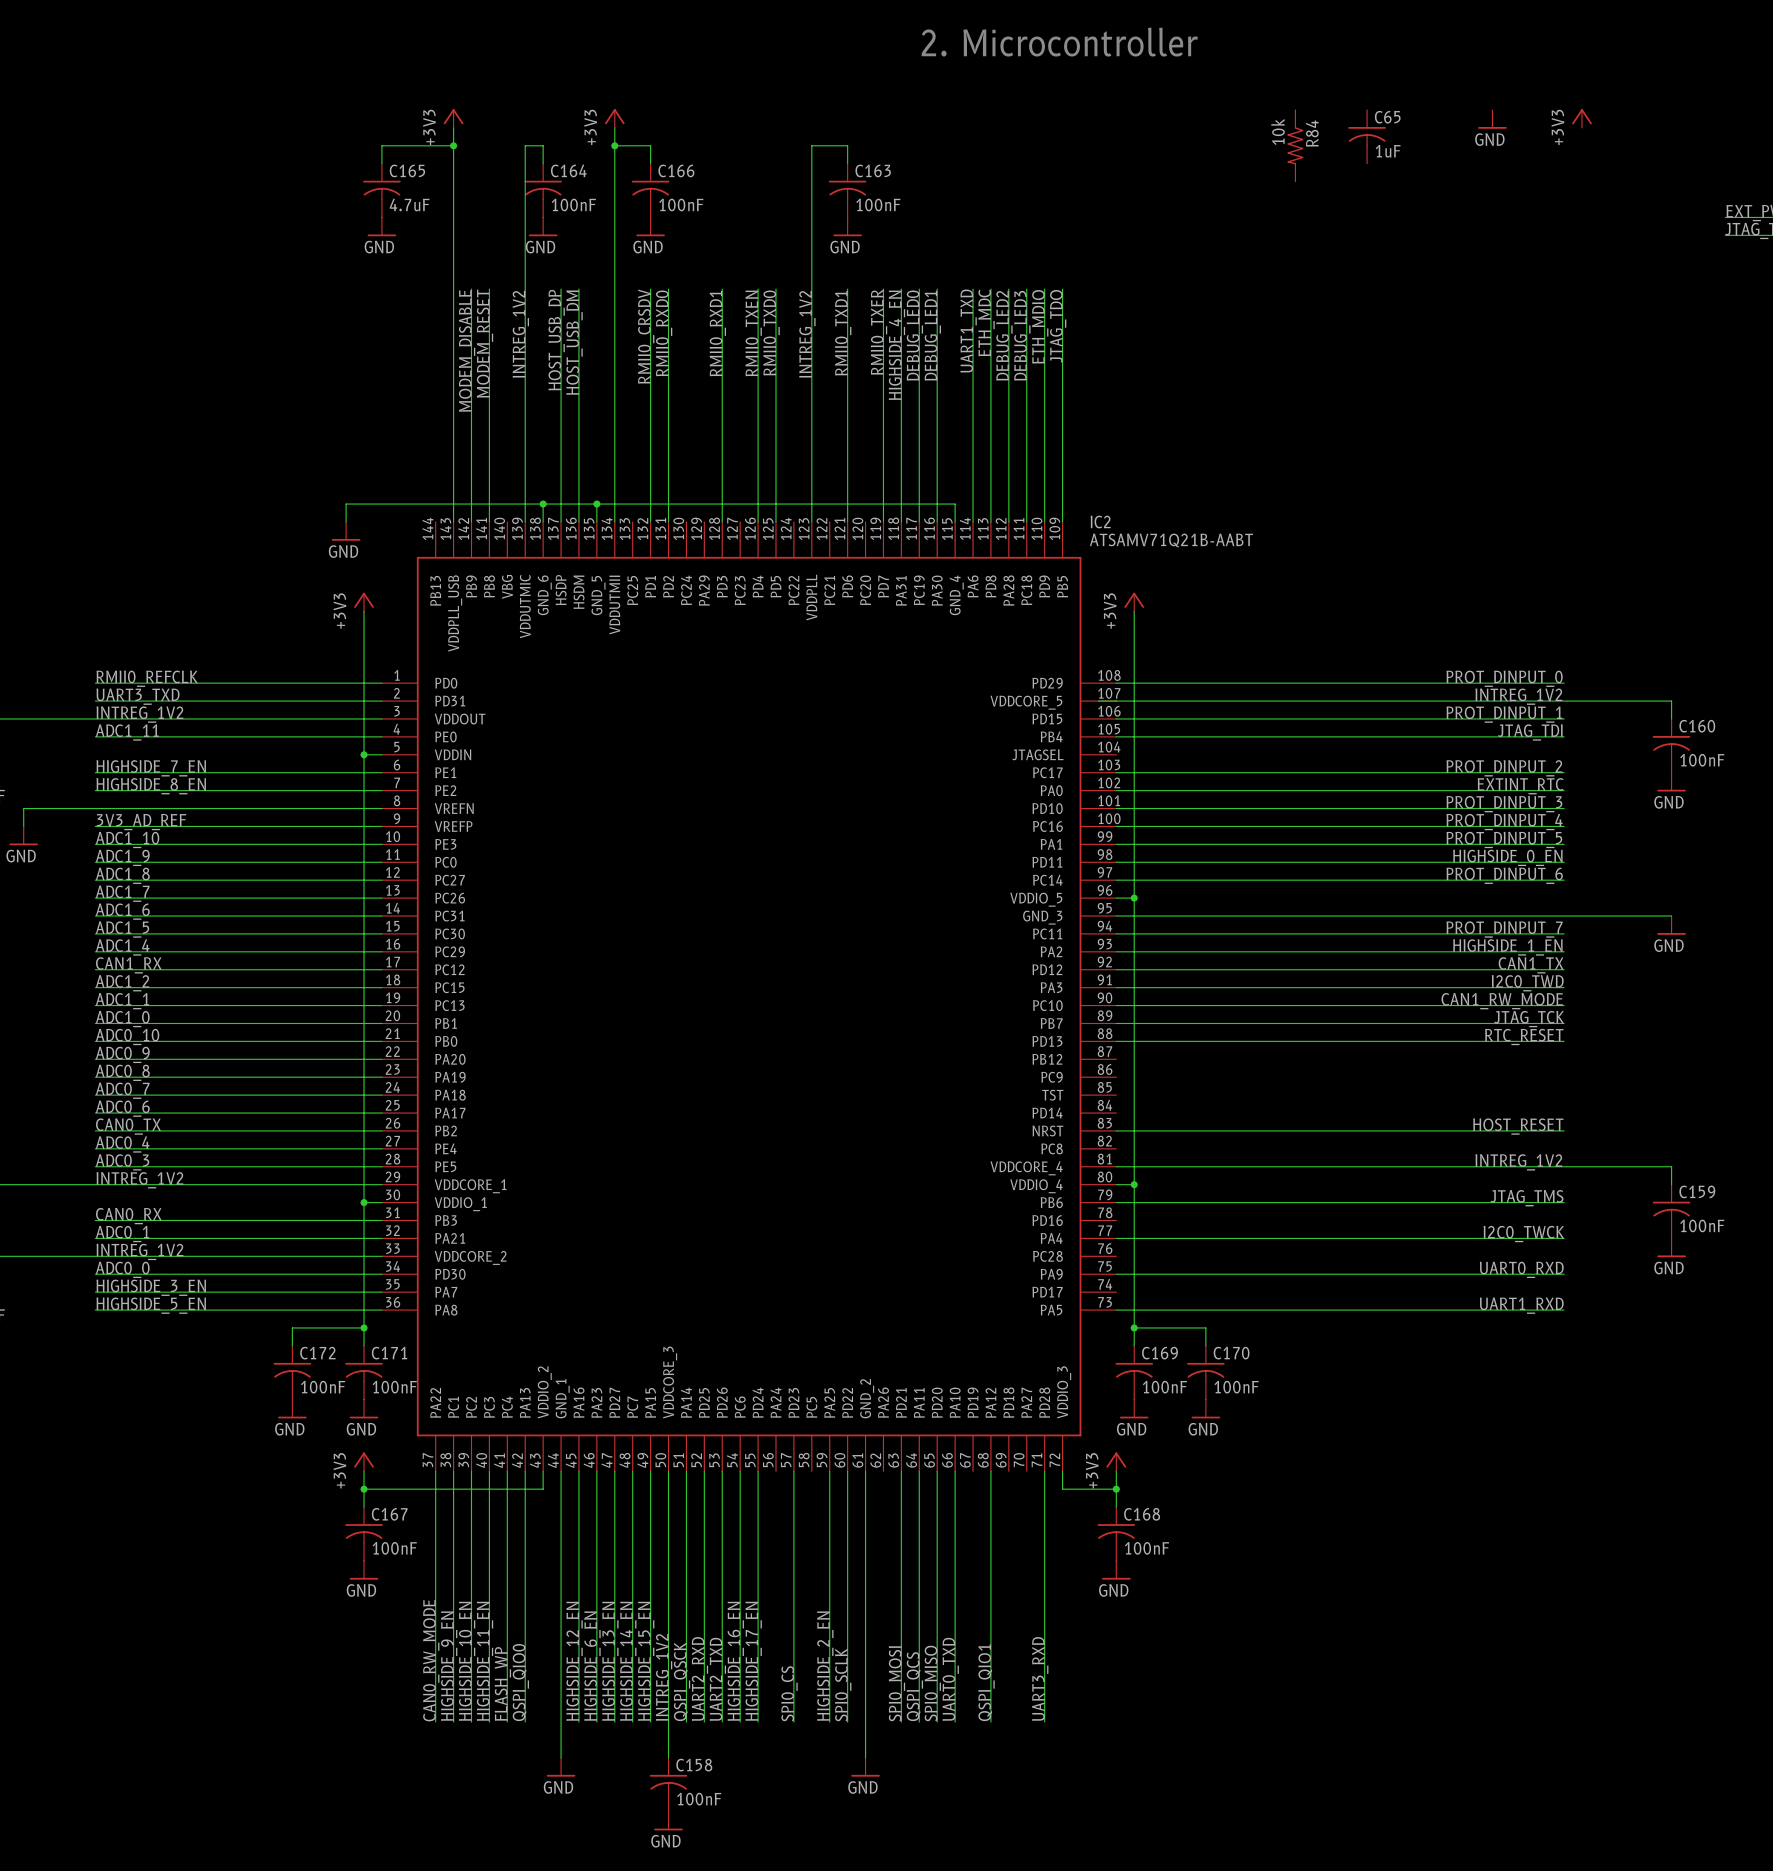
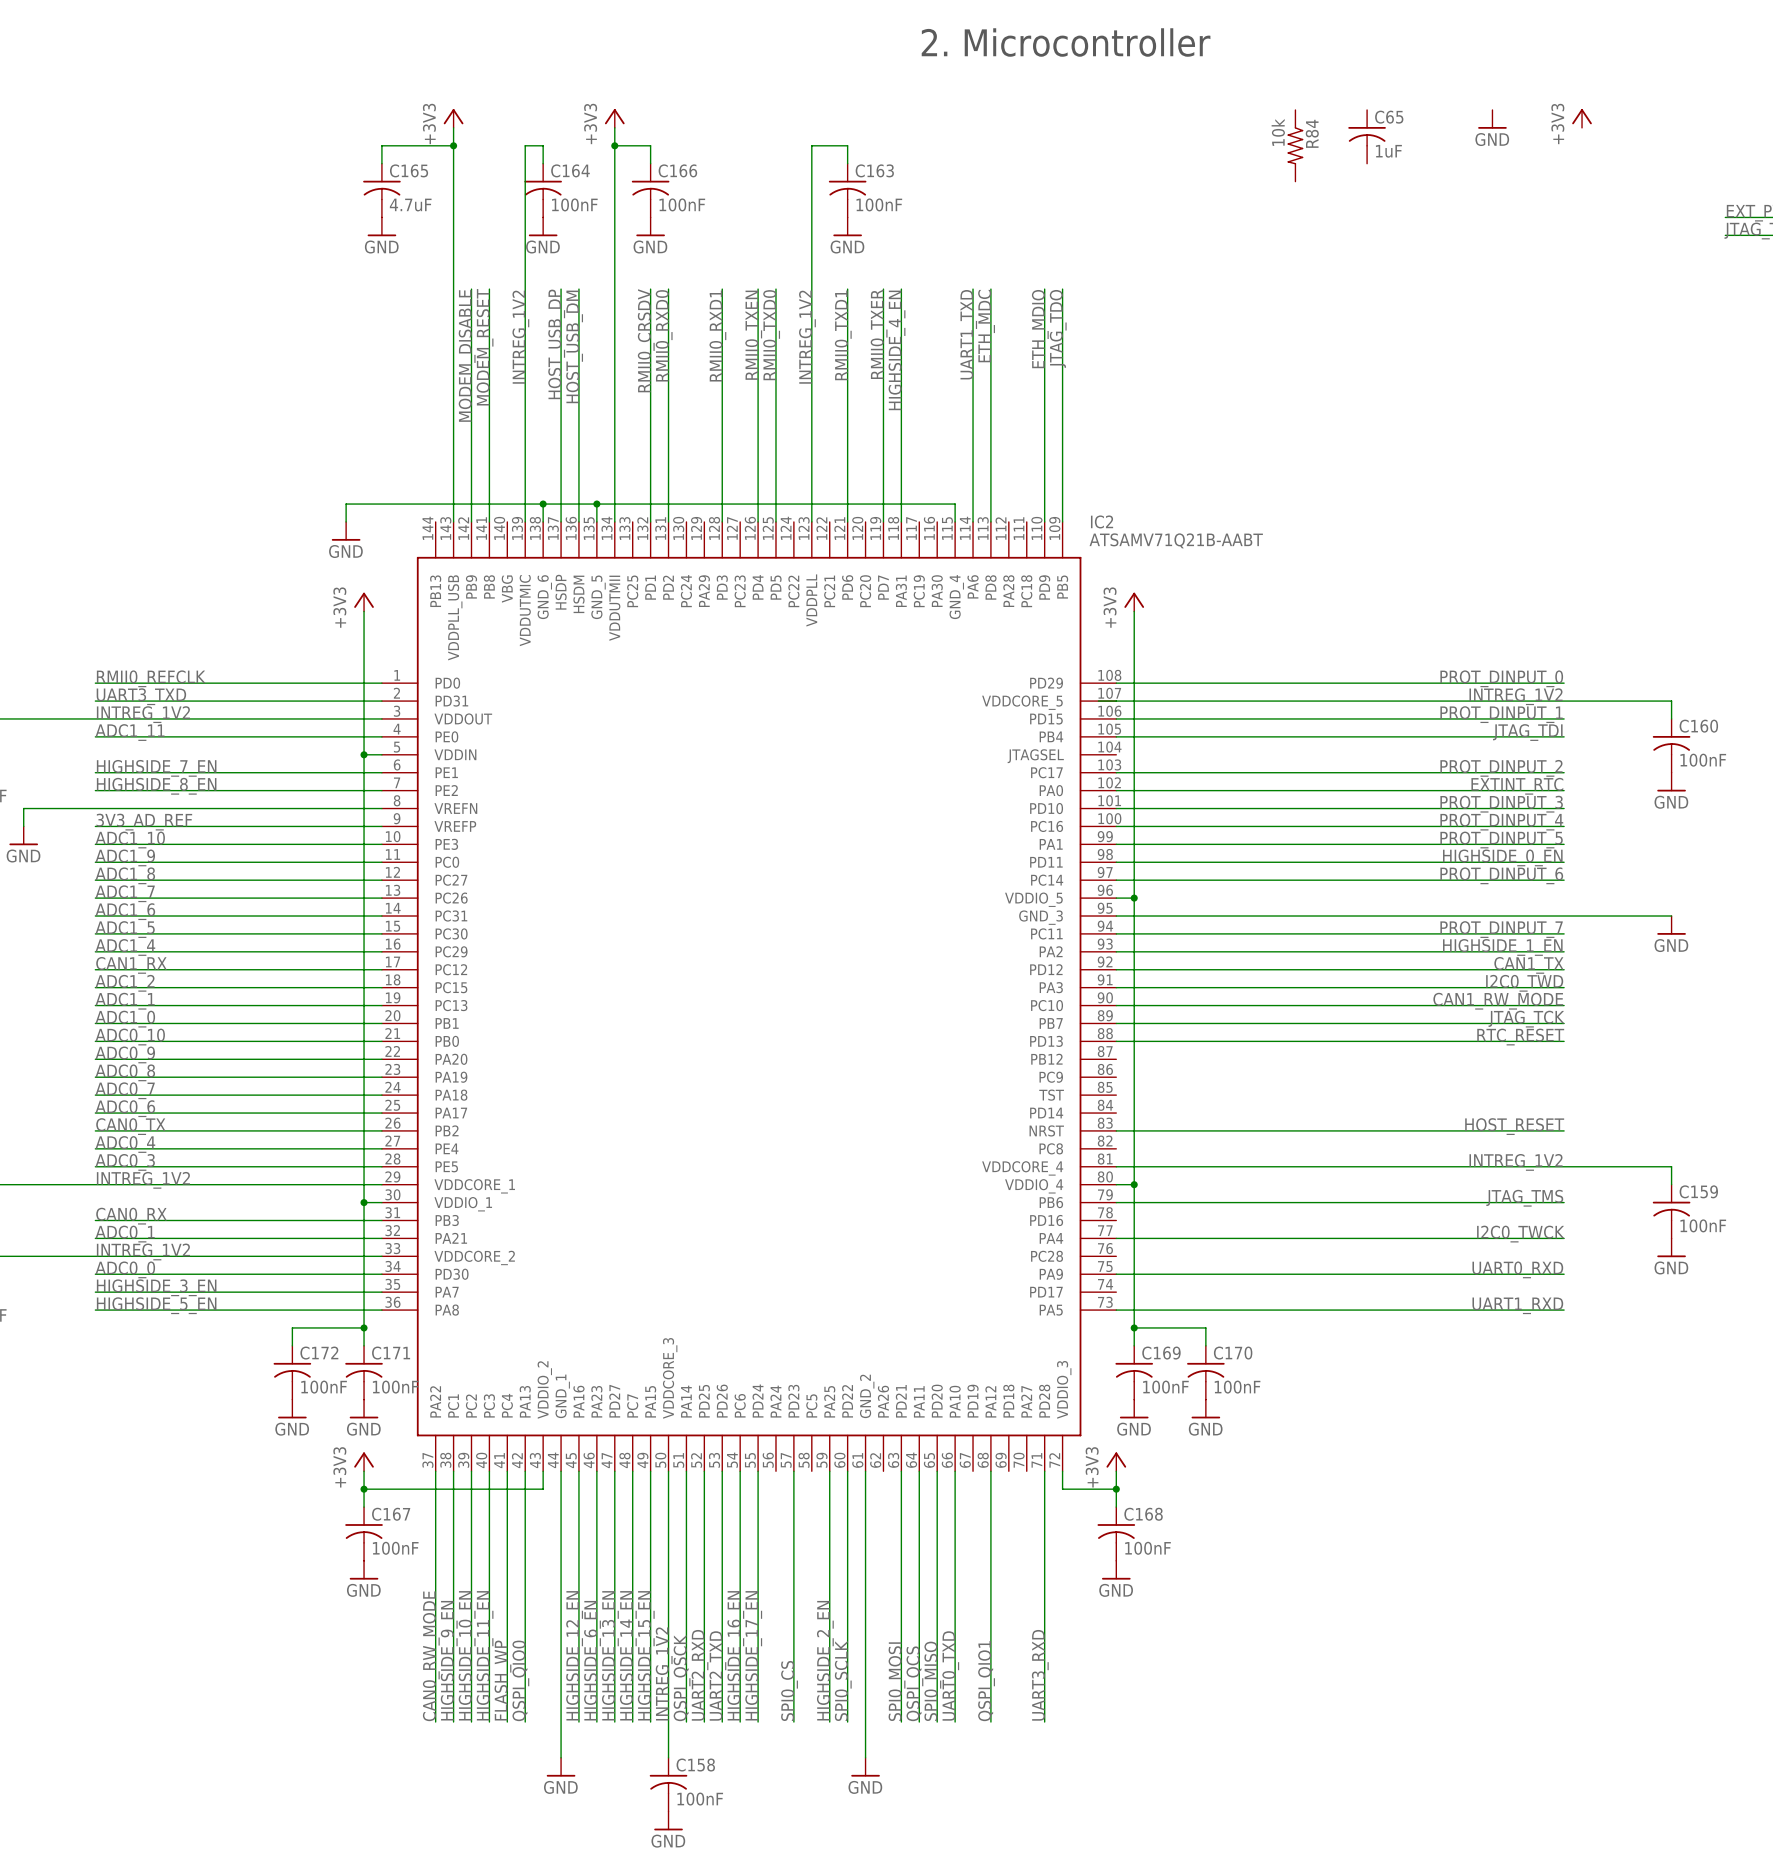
wire: (919, 289) (919, 521) -> none
wire: (937, 289) (937, 521) -> none
wire: (1008, 289) (1008, 521) -> none
wire: (1026, 289) (1026, 521) -> none
label: DEBUG_LED0 (914, 335) -> none
label: DEBUG_LED1 (932, 335) -> none
label: DEBUG_LED2 (1004, 335) -> none
label: DEBUG_LED3 (1022, 335) -> none

